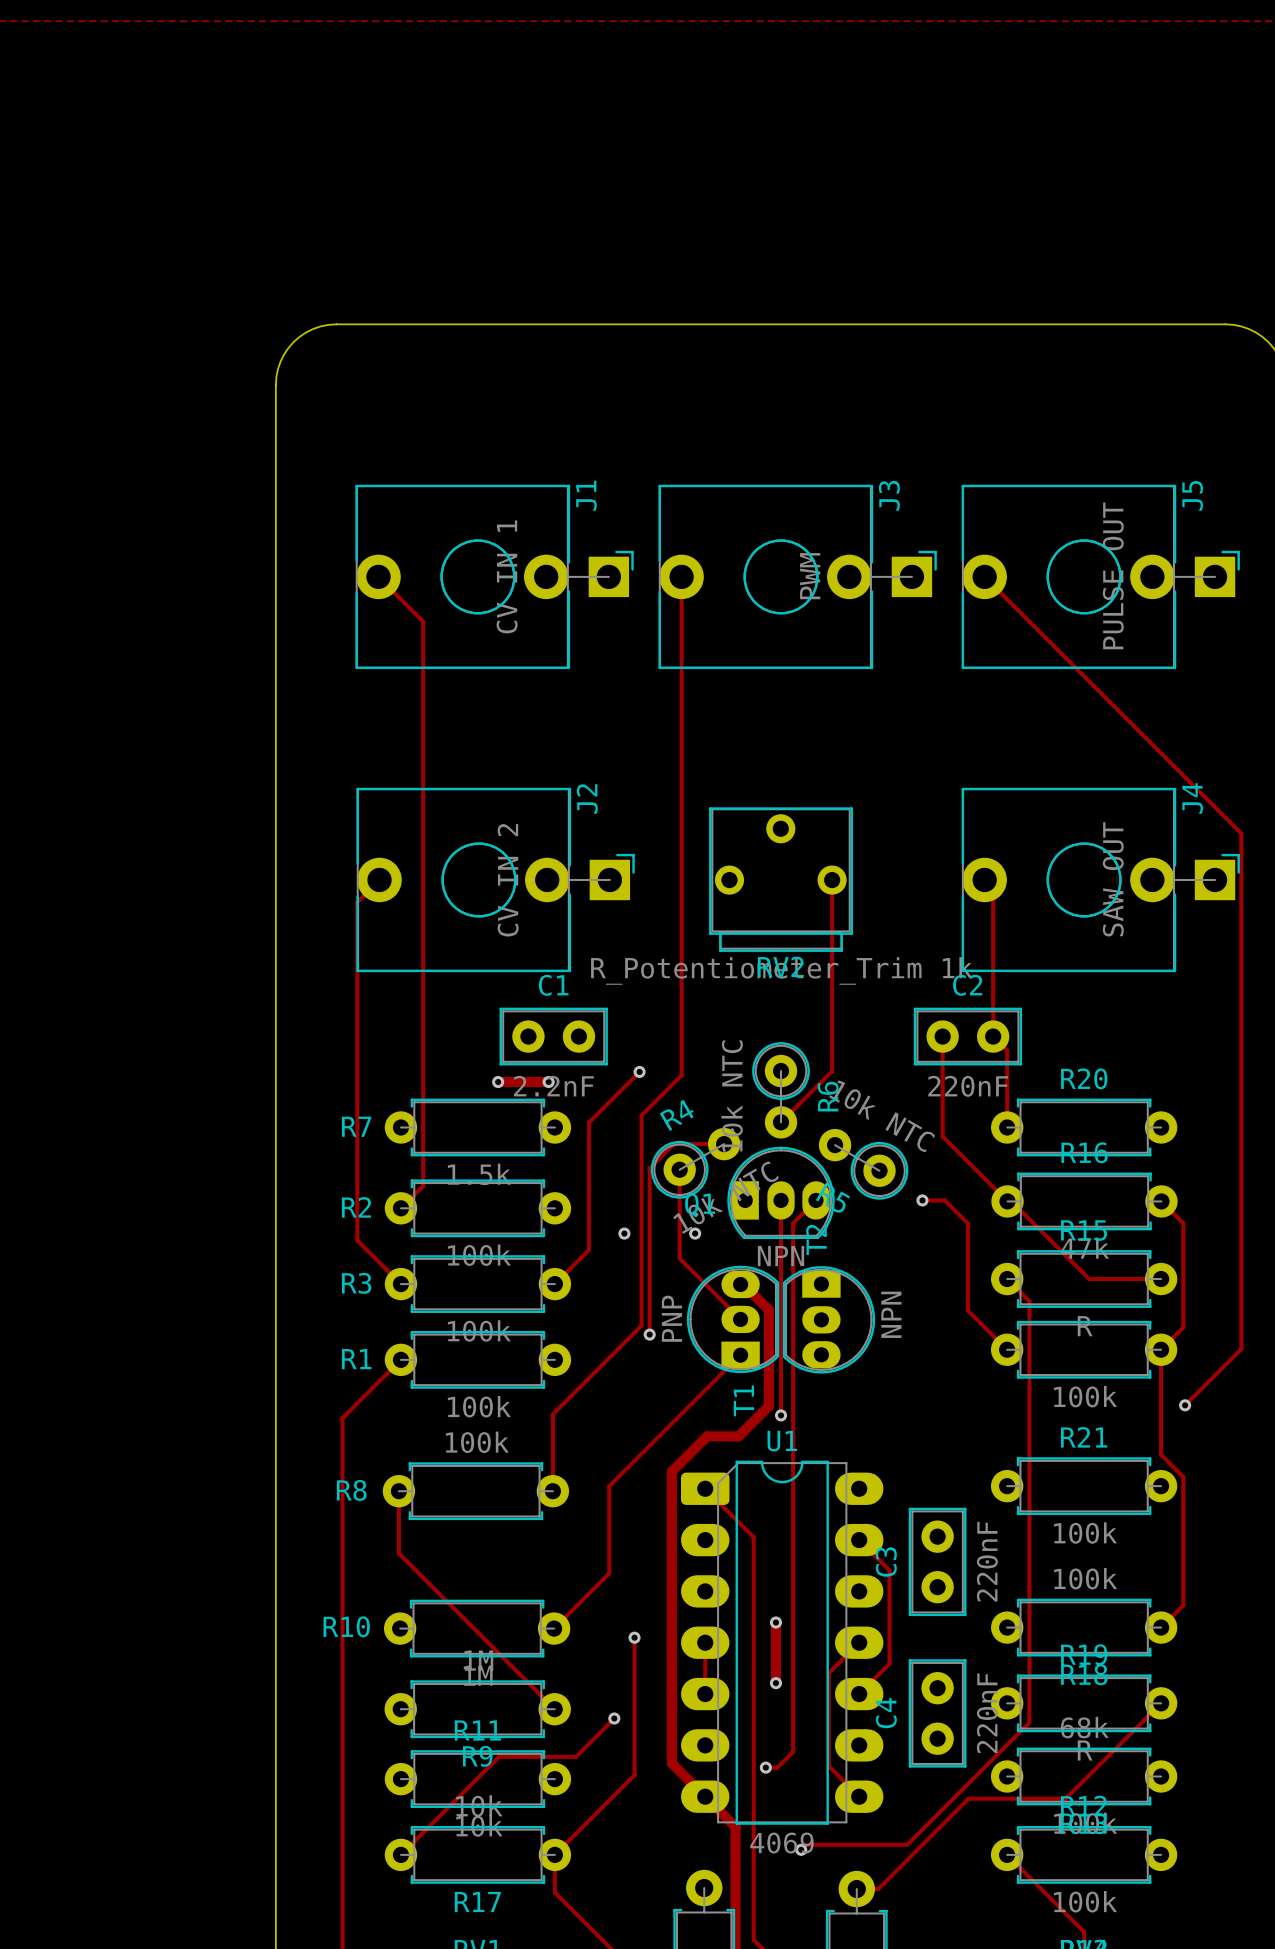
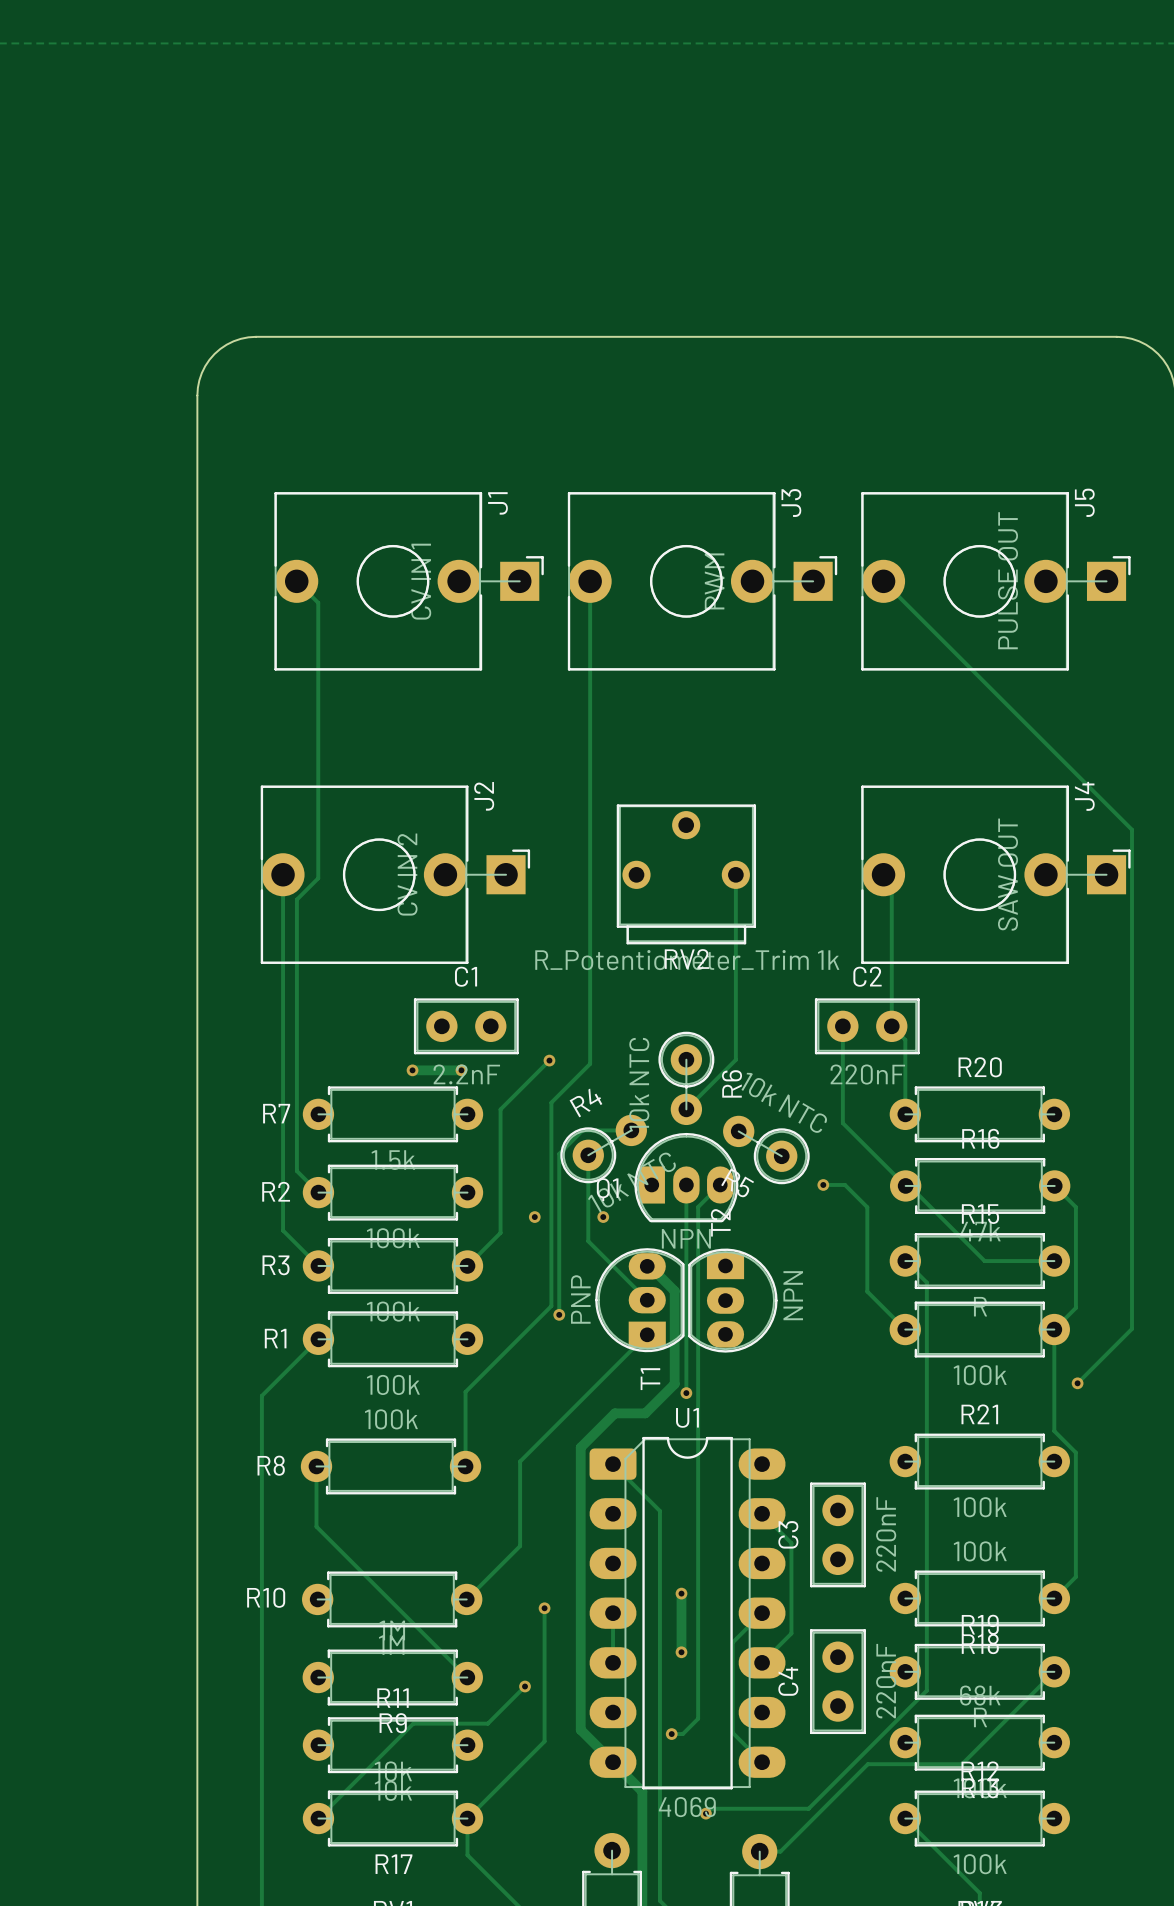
track: (400, 599) (423, 621) (423, 1186) (400, 1208) -> (318, 602) (318, 878) (296, 899) (296, 1171) (318, 1192)
track: (379, 879) (357, 902) (357, 1240) (364, 1247) -> (283, 874) (283, 1230)
J2 position: (495, 879) -> (395, 874)

